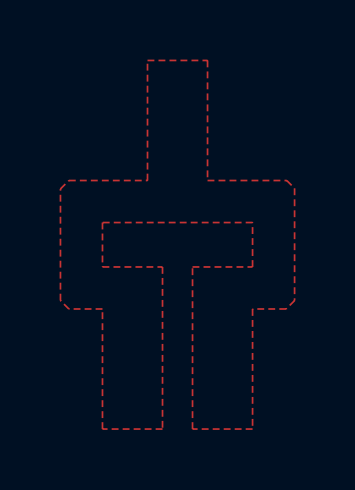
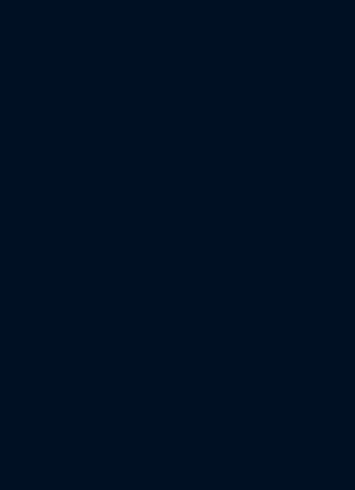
top zone outline: (147, 60) (147, 180) (68, 180) (60, 188) (60, 300) (68, 308) (102, 308) (102, 429) (162, 429) (162, 266) (102, 266) (102, 222) (252, 222) (252, 266) (192, 266) (192, 429) (252, 429) (252, 308) (286, 308) (294, 300) (294, 188) (286, 180) (207, 180) (207, 60) (147, 60) -> none

